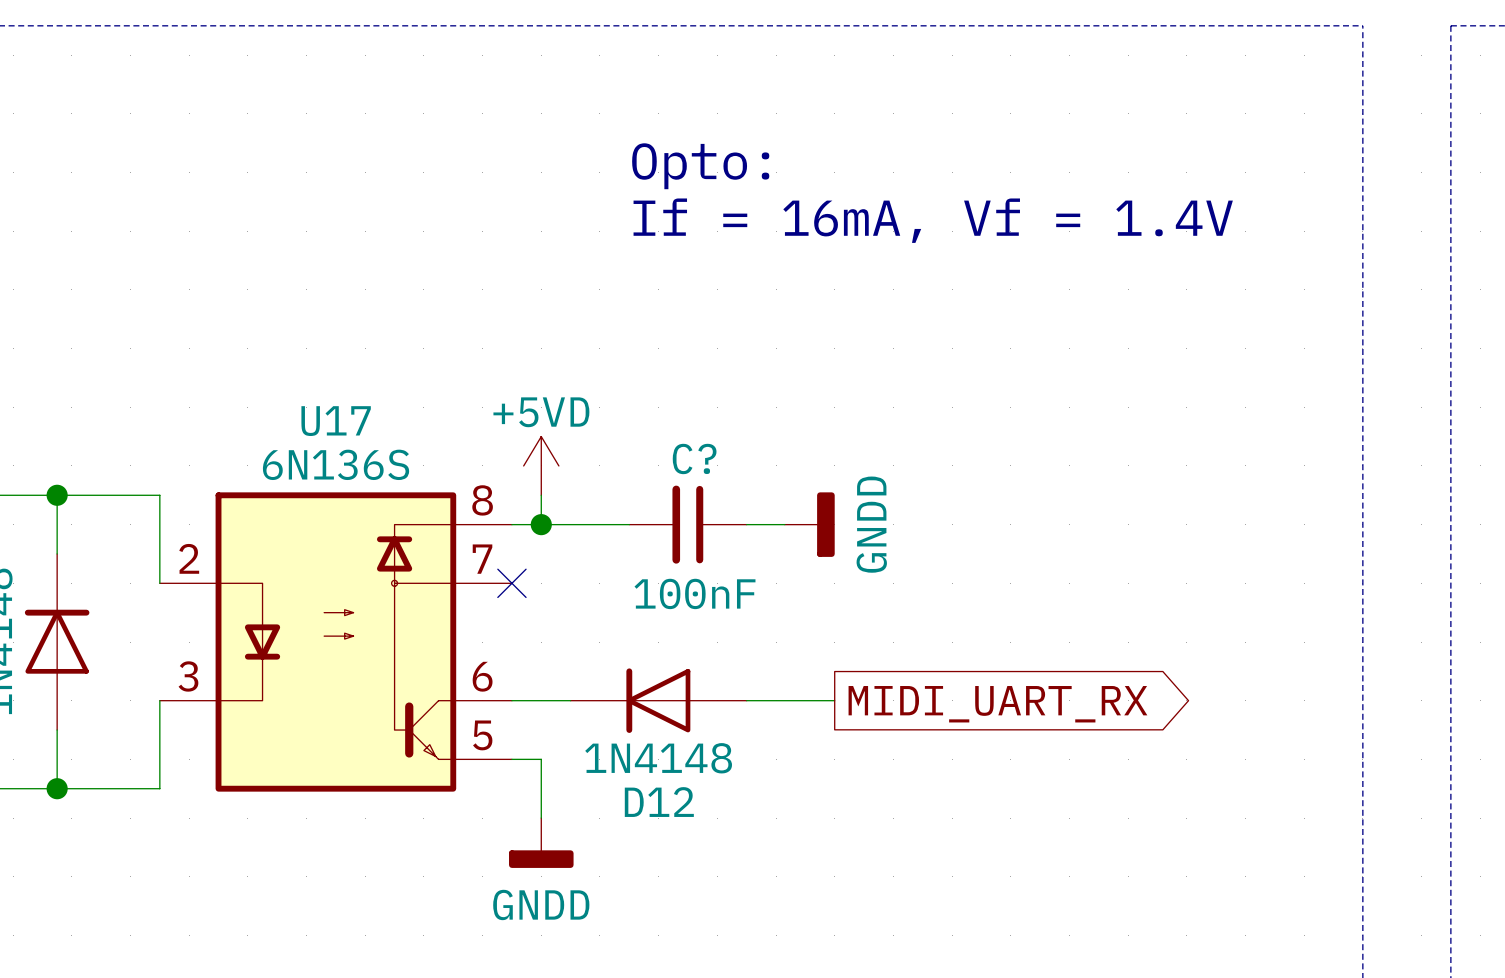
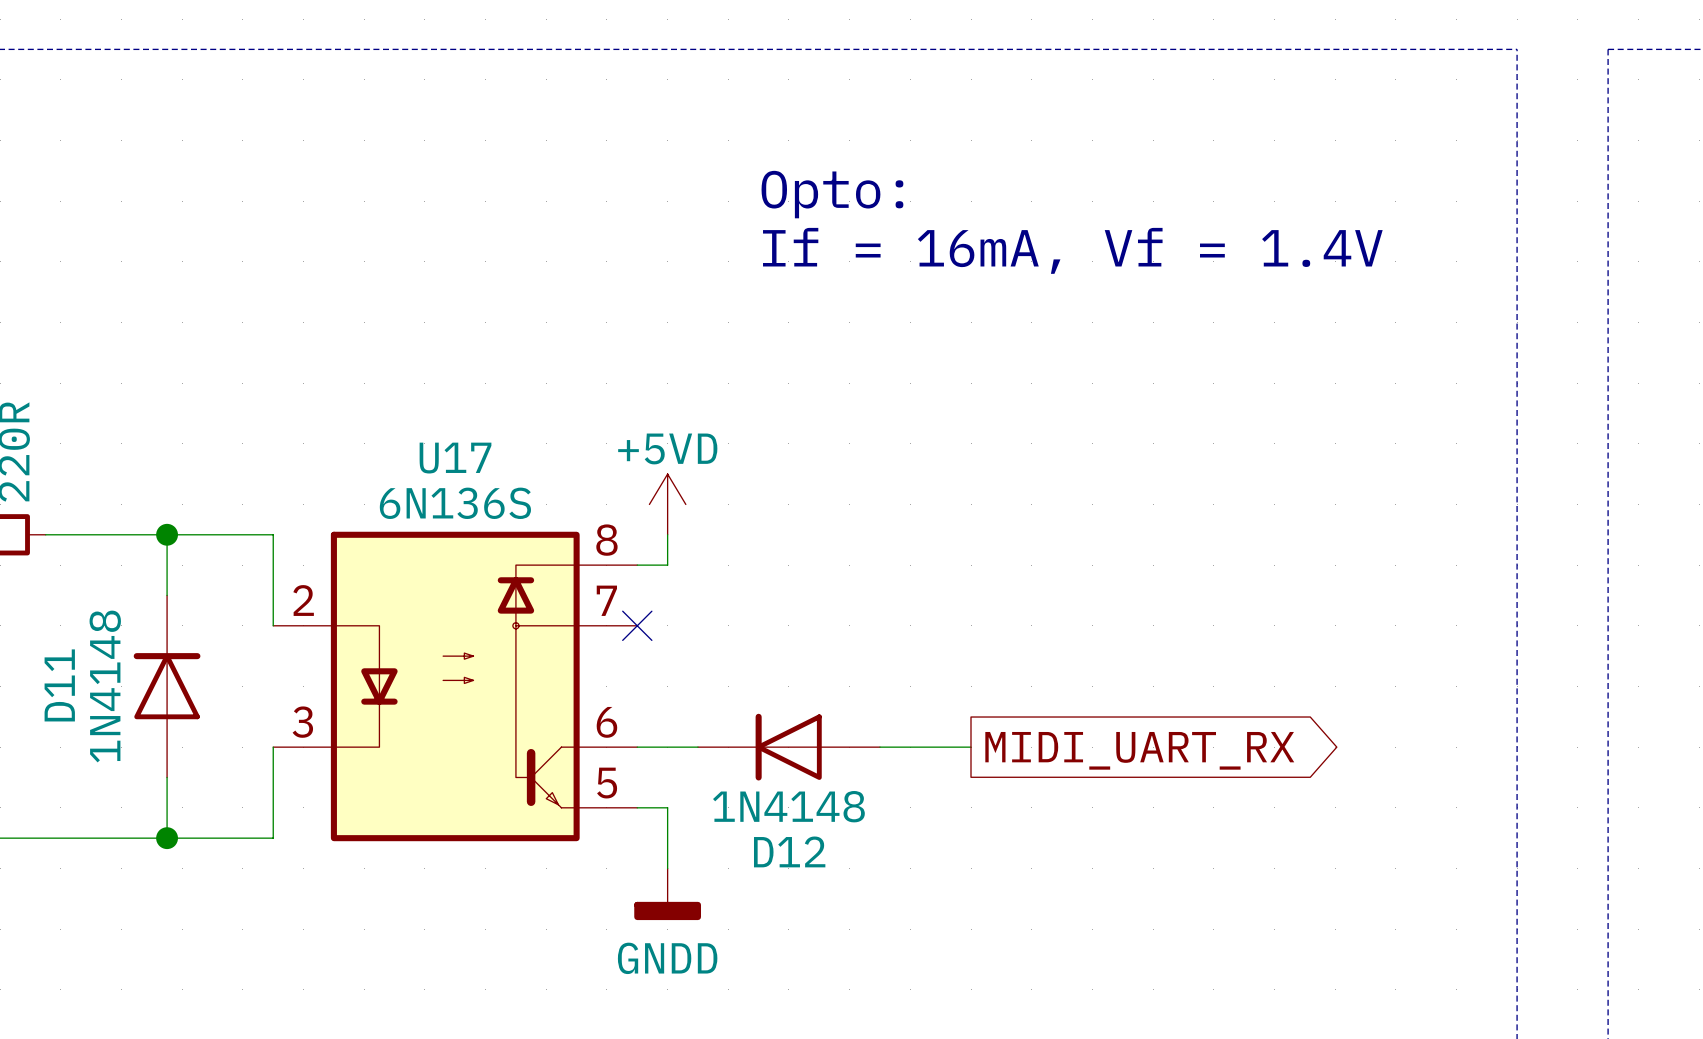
wire: (541, 524) (629, 524) -> none
junction: (541, 524) -> none
C?: 100nF (687, 524) -> none
wire: (746, 524) (784, 524) -> none
power symbol: GNDD (809, 524) -> none

